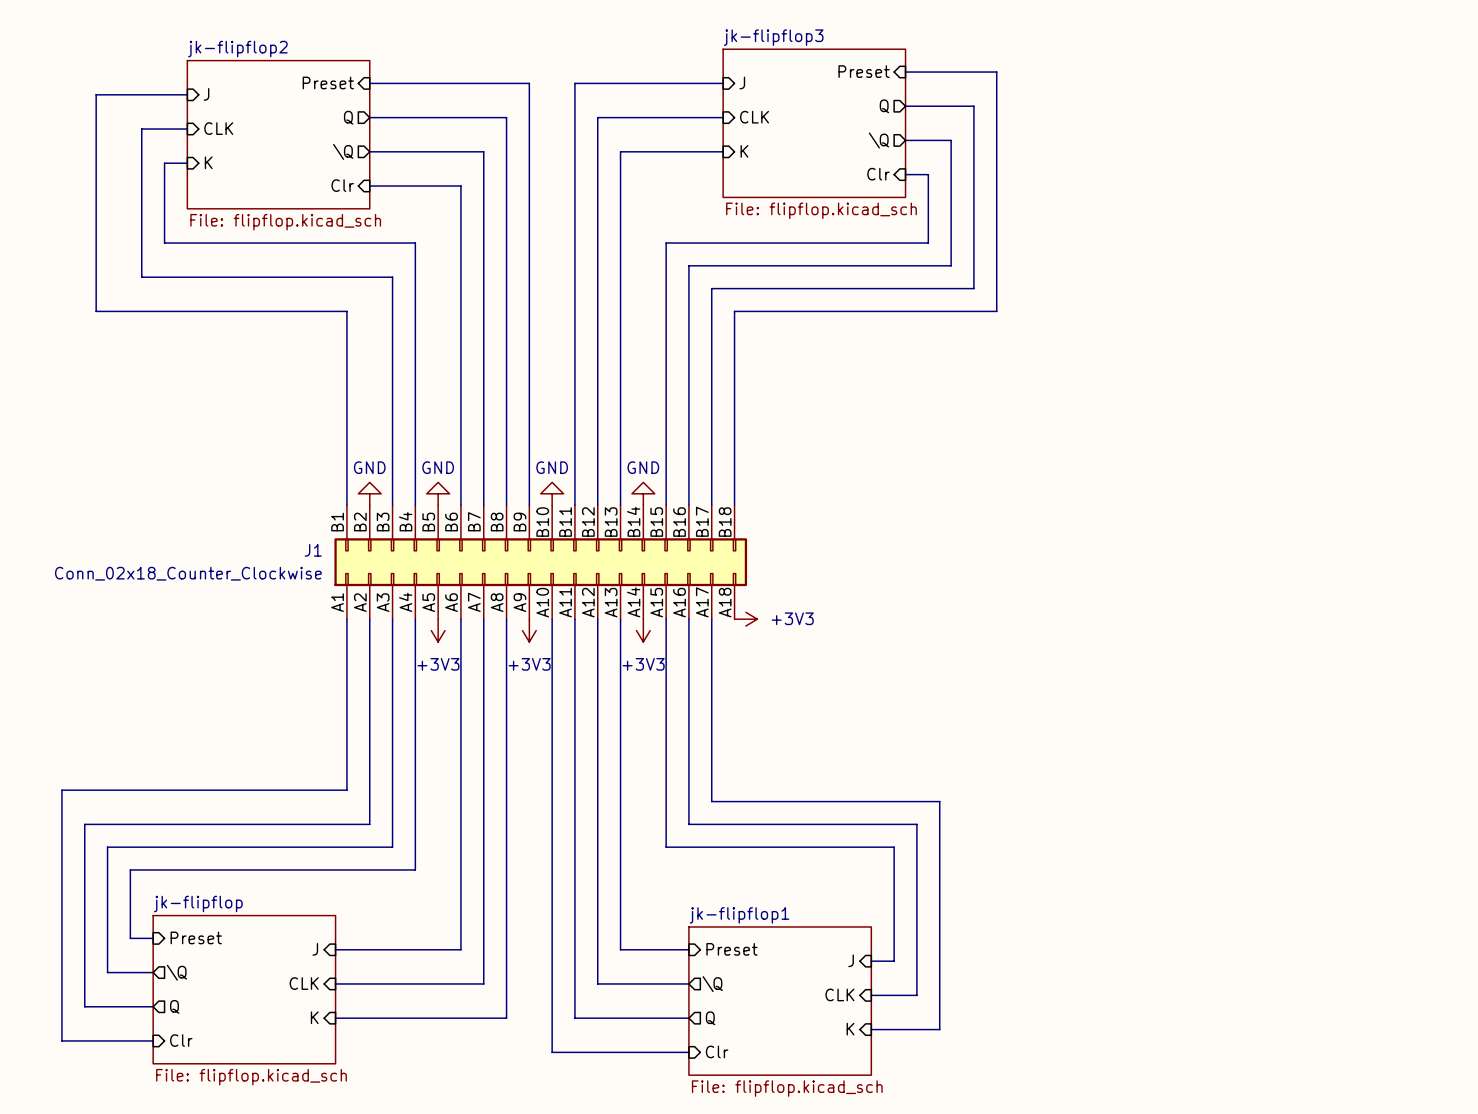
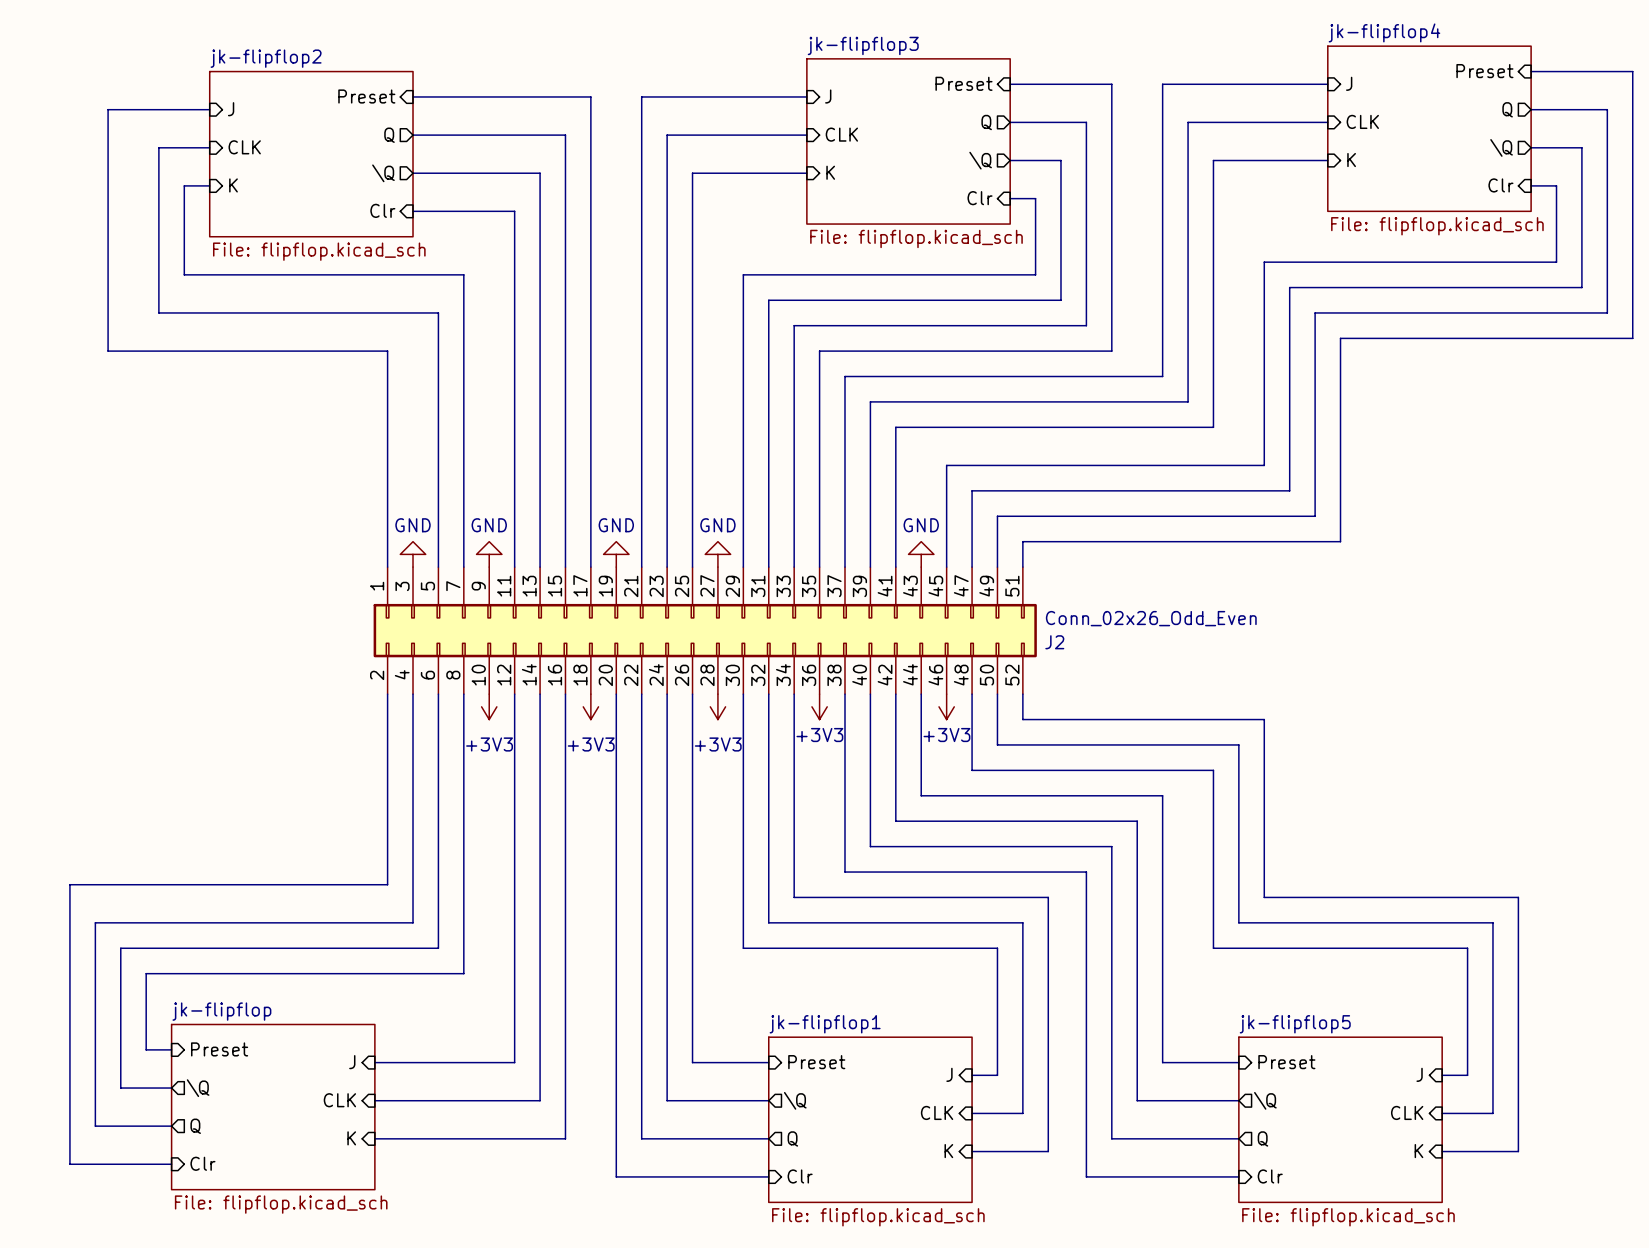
sheet pin: none -> Preset (1484, 71)
wire: none -> (1531, 71) (1632, 71) (1632, 338) (1340, 338) (1340, 541) (1022, 541) (1022, 567)
sheet pin: none -> J (1349, 83)
wire: none -> (1327, 84) (1162, 84) (1162, 376) (844, 376) (844, 567)
sheet pin: none -> Q (1507, 109)
wire: none -> (1531, 109) (1607, 109) (1607, 312) (1315, 312) (1315, 516) (997, 516) (997, 567)
sheet pin: none -> CLK (1362, 121)
wire: none -> (1327, 122) (1188, 122) (1188, 401) (870, 401) (870, 567)
sheet jk-flipflop4: none -> File: flipflop.kicad_sch (1429, 128)
sheet pin: none -> \Q (1501, 147)
wire: none -> (1531, 147) (1581, 147) (1581, 287) (1289, 287) (1289, 490) (972, 490) (972, 567)
sheet pin: none -> K (1351, 160)
wire: none -> (1327, 160) (1213, 160) (1213, 427) (895, 427) (895, 567)
sheet pin: none -> Clr (1500, 185)
wire: none -> (1531, 185) (1556, 185) (1556, 262) (1264, 262) (1264, 465) (946, 465) (946, 567)
power symbol: none -> GND (921, 554)
J1: Conn_02x18_Counter_Clockwise (540, 562) -> none
J2: none -> Conn_02x26_Odd_Even (705, 630)
power symbol text position: +3V3 (792, 618) -> +3V3 (819, 735)
power symbol rotation: 0° (745, 619) -> 90° clockwise (819, 706)
power symbol position: +3V3 (745, 619) -> +3V3 (819, 706)
wire: none -> (844, 694) (844, 872) (1086, 872) (1086, 1176) (1238, 1176)
wire: none -> (870, 694) (870, 846) (1111, 846) (1111, 1138) (1238, 1138)
wire: none -> (895, 694) (895, 821) (1137, 821) (1137, 1100) (1238, 1100)
wire: none -> (921, 694) (921, 795) (1162, 795) (1162, 1062) (1238, 1062)
wire: none -> (972, 694) (972, 770) (1213, 770) (1213, 948) (1467, 948) (1467, 1075) (1442, 1075)
wire: none -> (997, 694) (997, 744) (1238, 744) (1238, 922) (1492, 922) (1492, 1113) (1442, 1113)
wire: none -> (1022, 694) (1022, 719) (1264, 719) (1264, 897) (1518, 897) (1518, 1151) (1442, 1151)
power symbol: none -> +3V3 (946, 706)
sheet pin: none -> Preset (1286, 1062)
sheet pin: none -> J (1419, 1074)
sheet pin: none -> \Q (1265, 1100)
sheet pin: none -> CLK (1407, 1112)
sheet jk-flipflop5: none -> File: flipflop.kicad_sch (1340, 1119)
sheet pin: none -> Q (1262, 1138)
sheet pin: none -> K (1418, 1151)
sheet pin: none -> Clr (1270, 1176)

